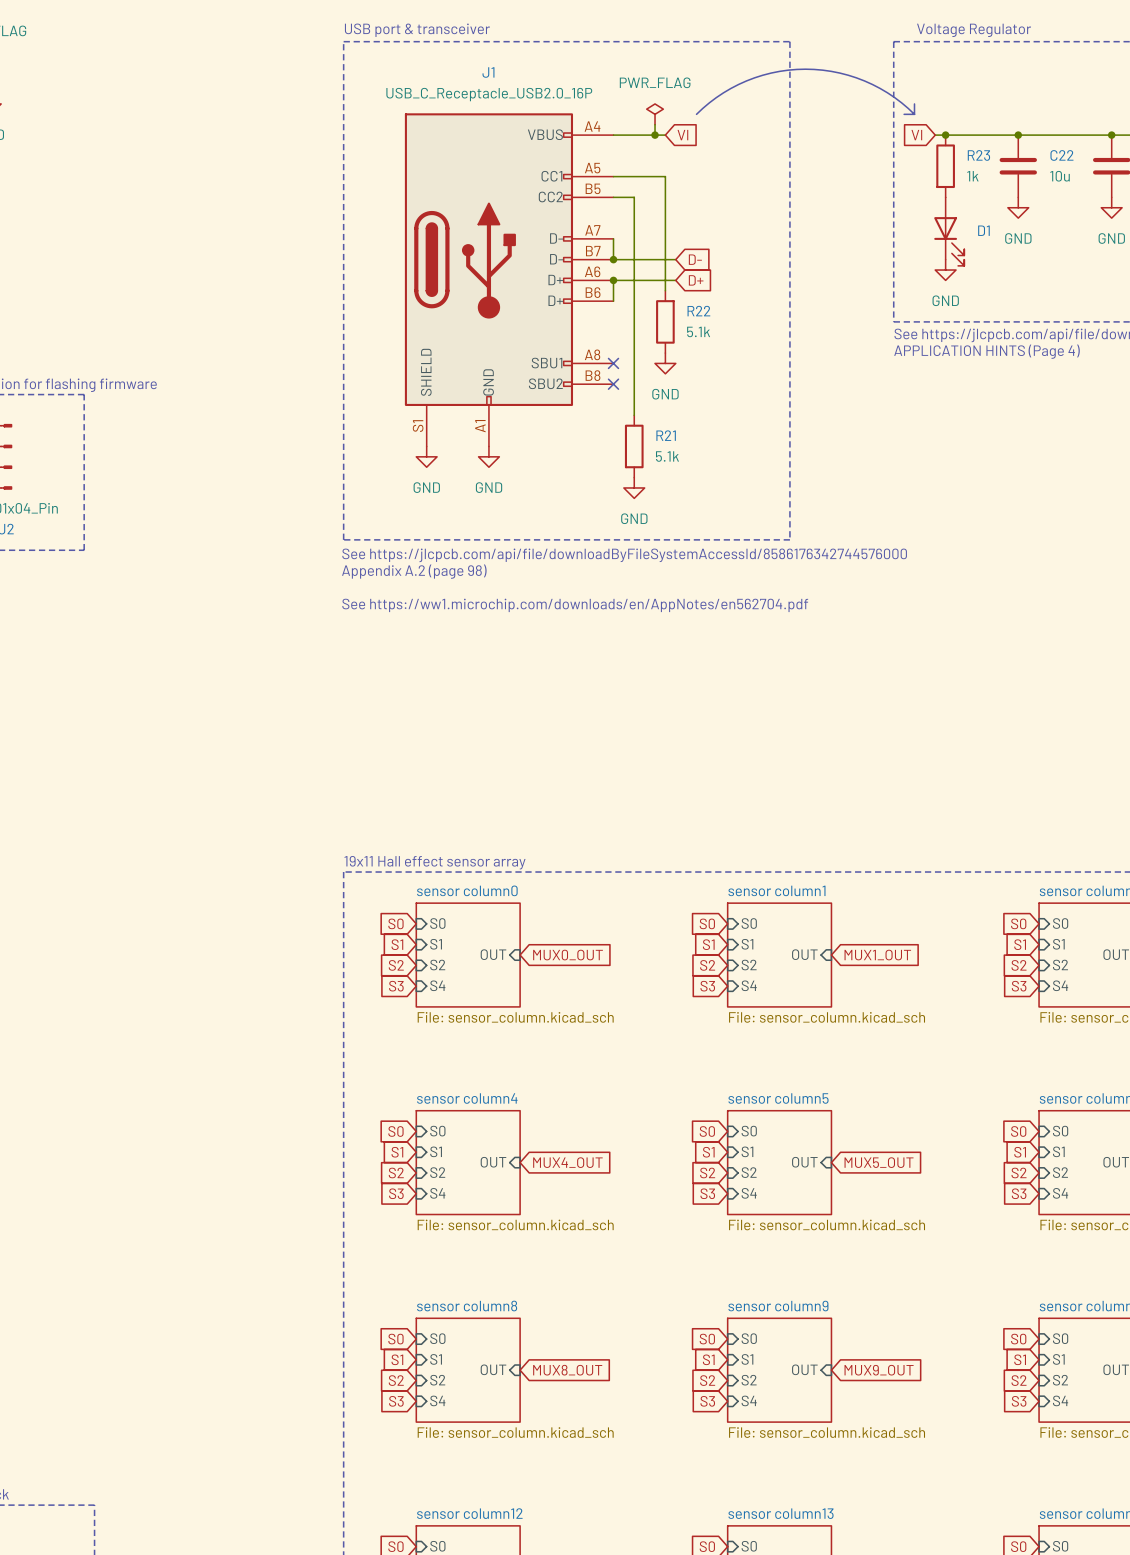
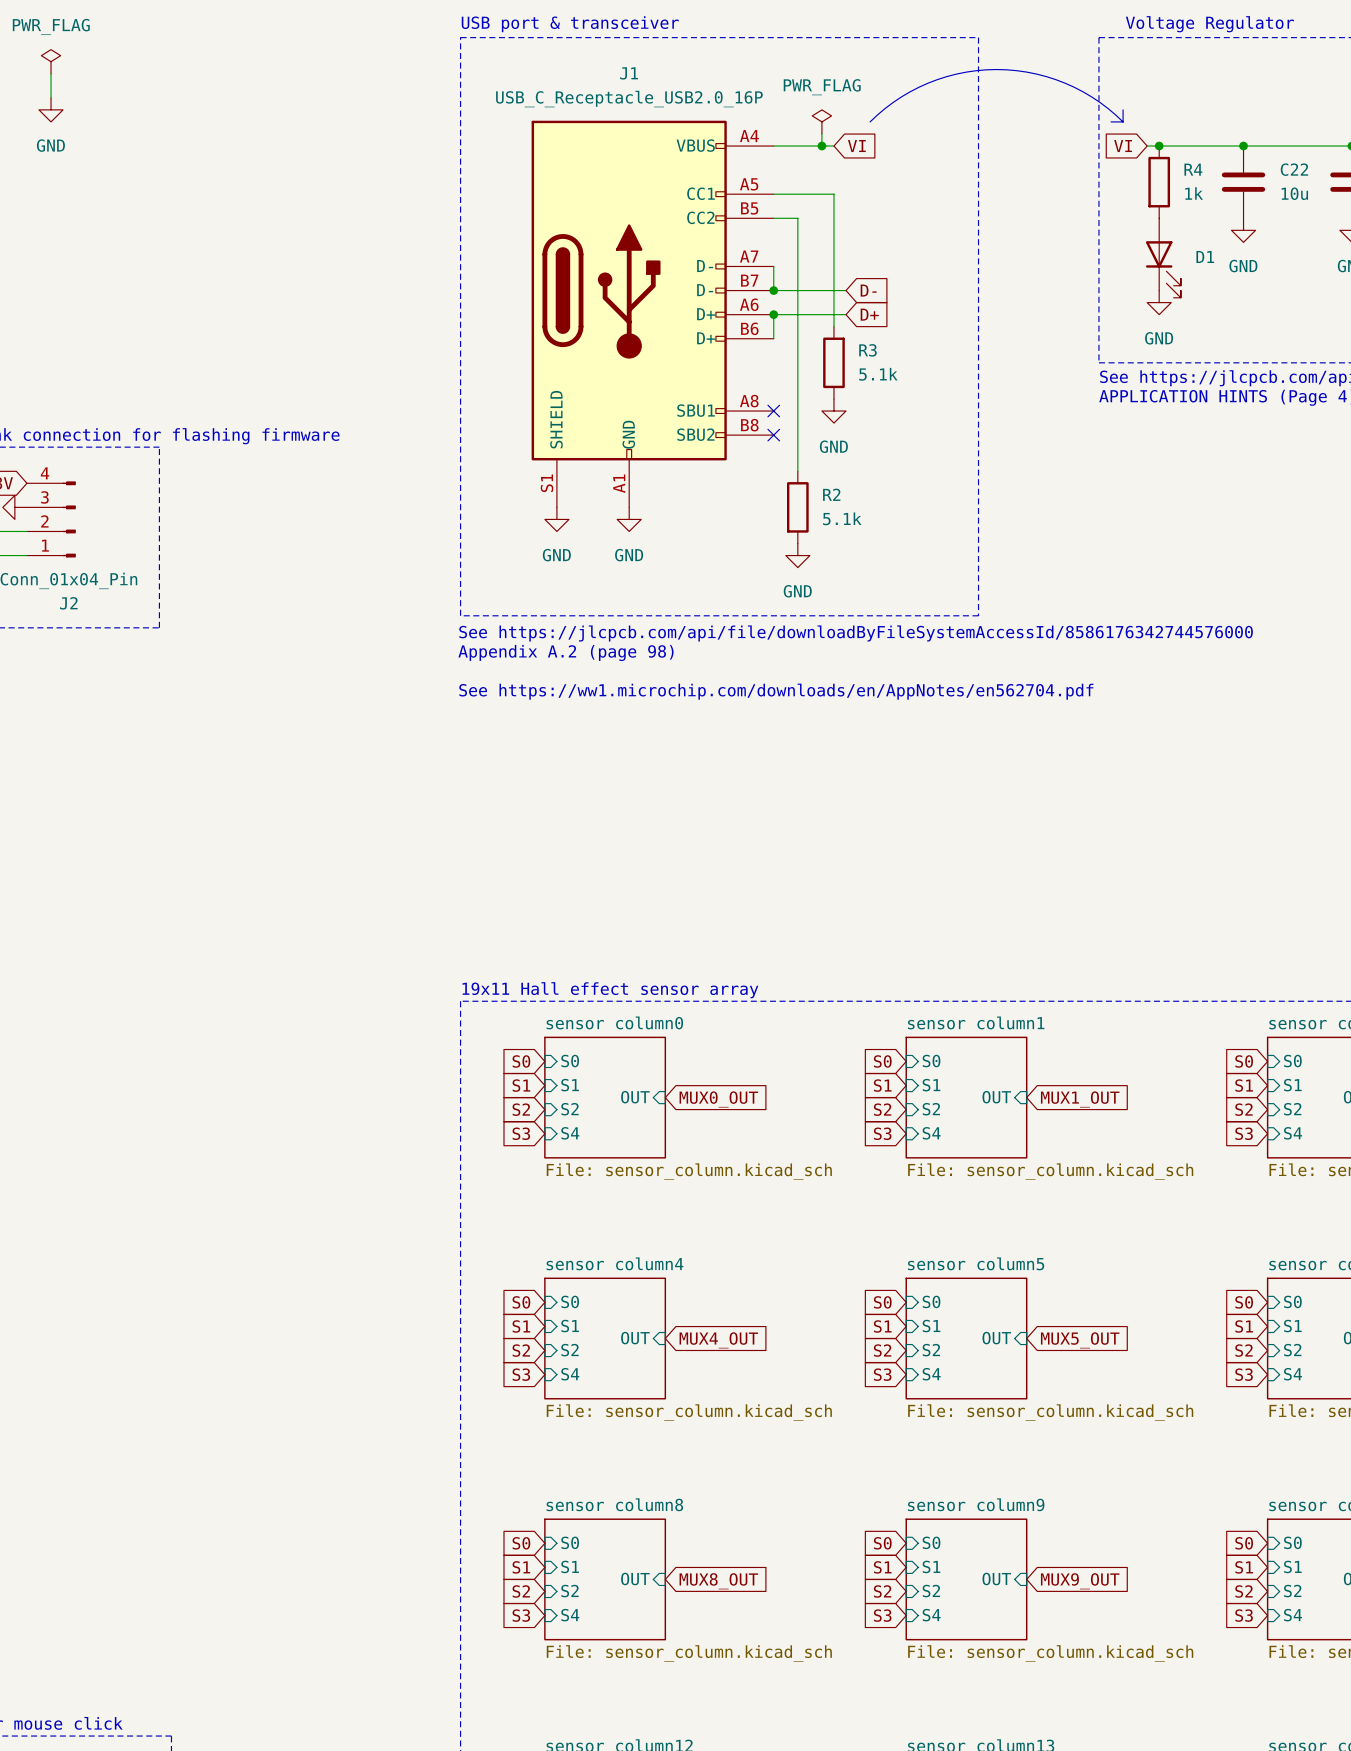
R23 name: R23 (978, 155) -> R4 (1193, 169)
R22 name: R22 (698, 311) -> R3 (867, 350)
R21 name: R21 (666, 435) -> R2 (831, 494)

